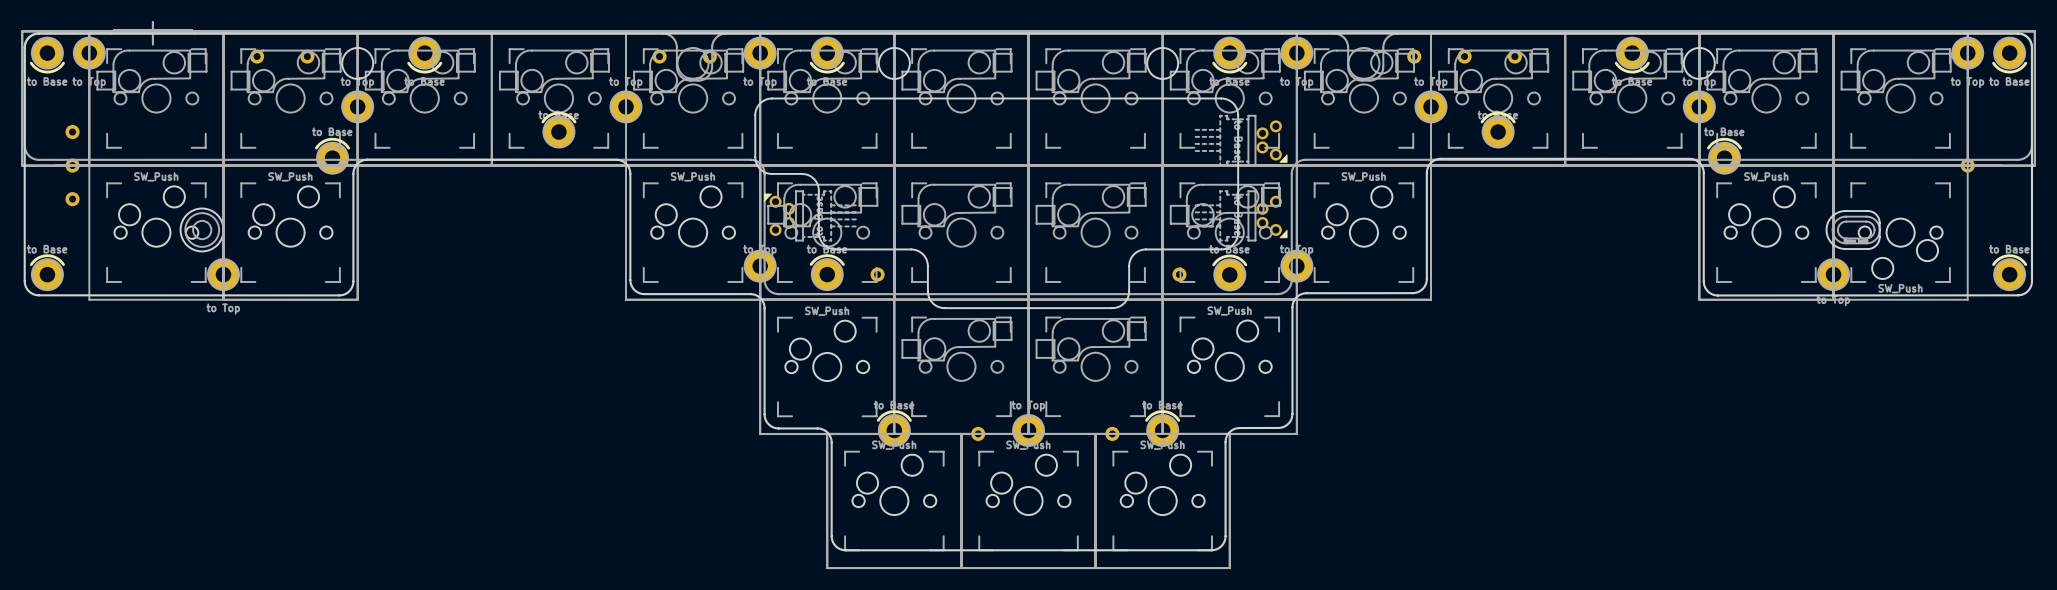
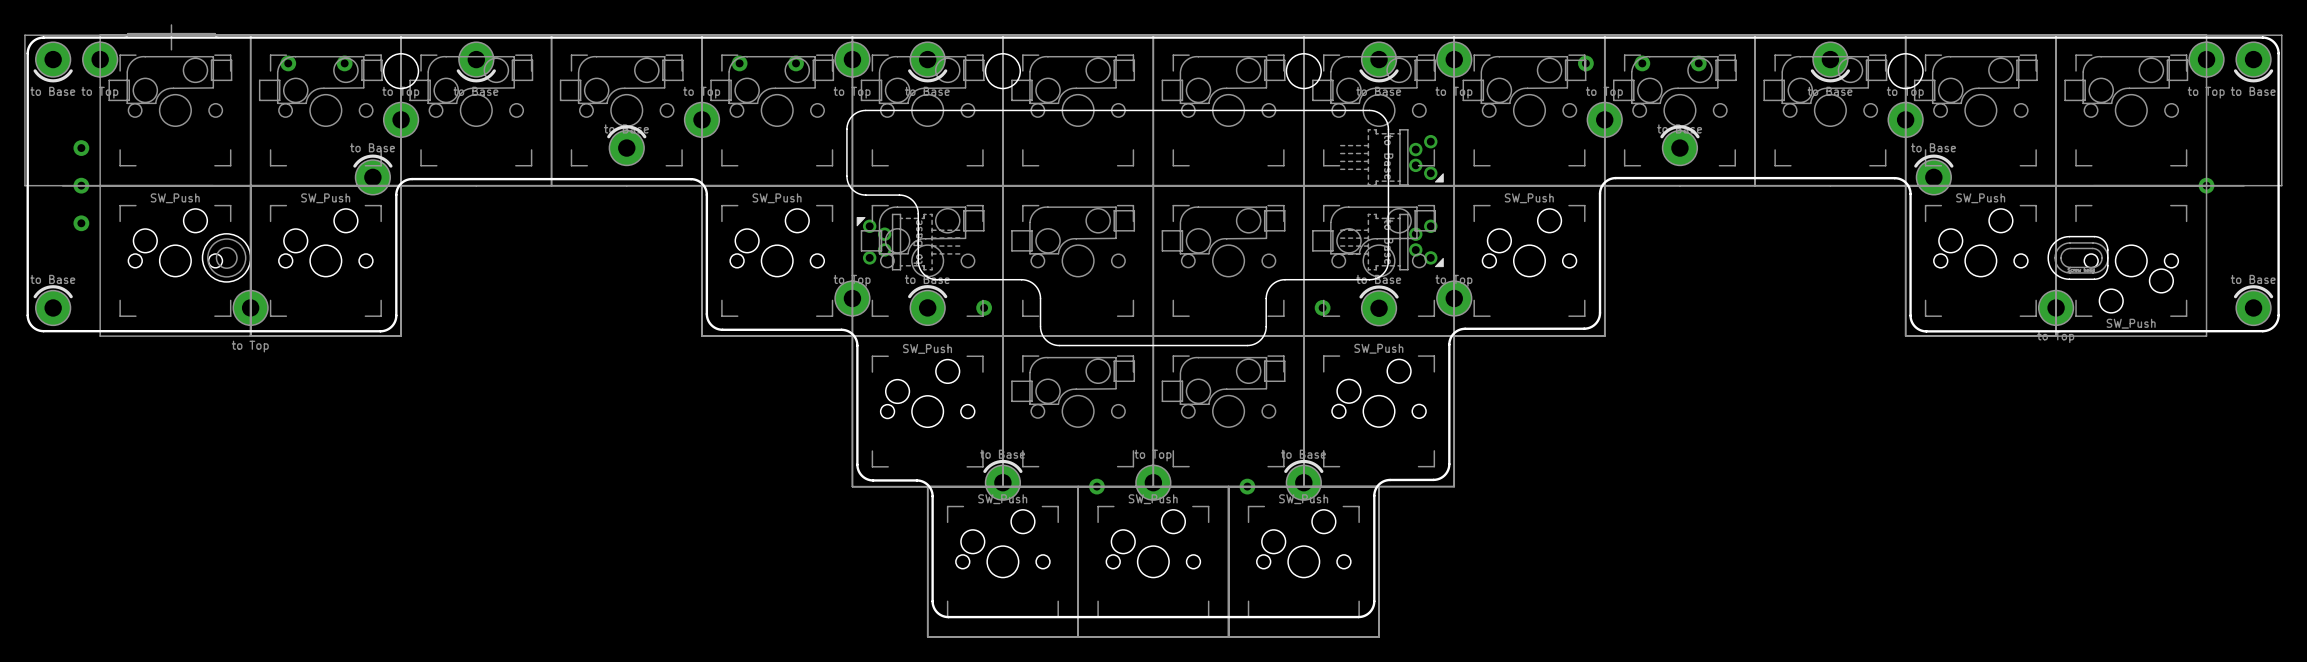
drawing: [21, 21, 2036, 301] -> none

